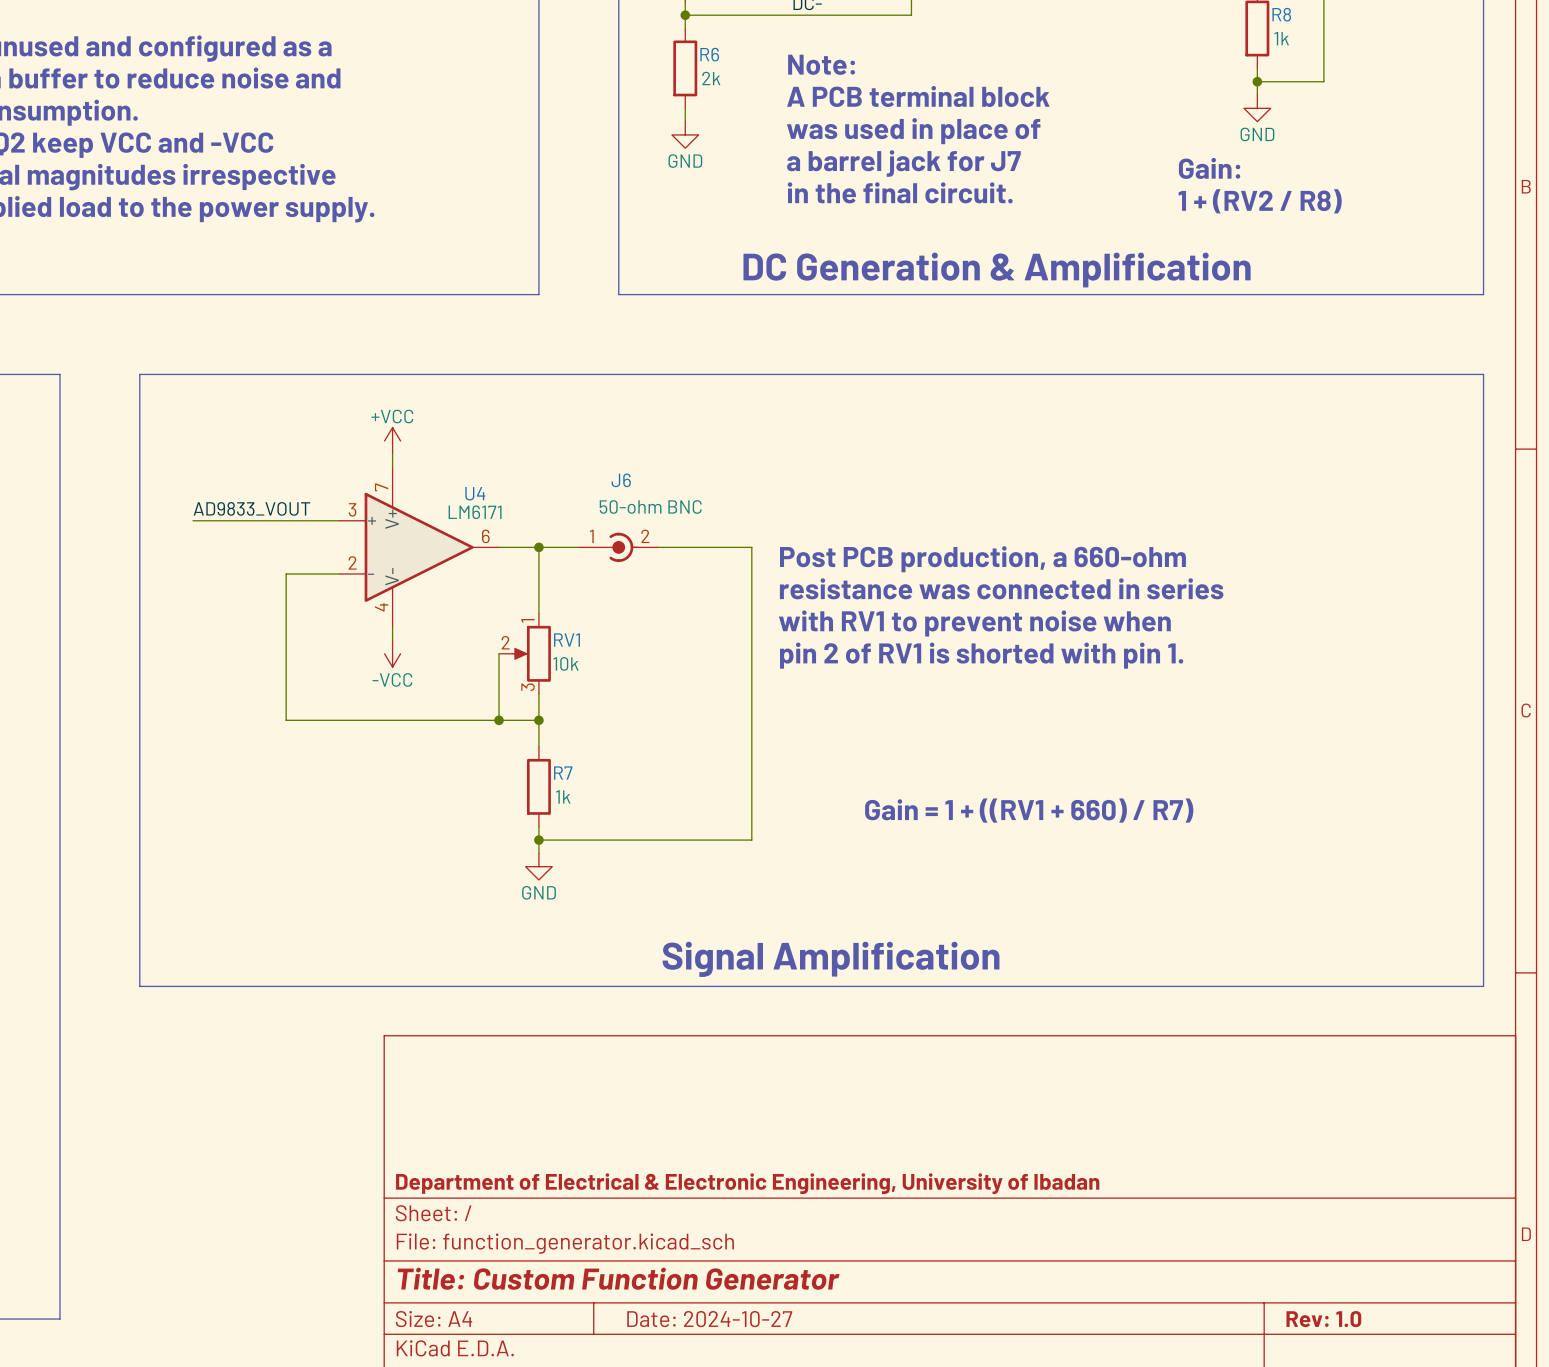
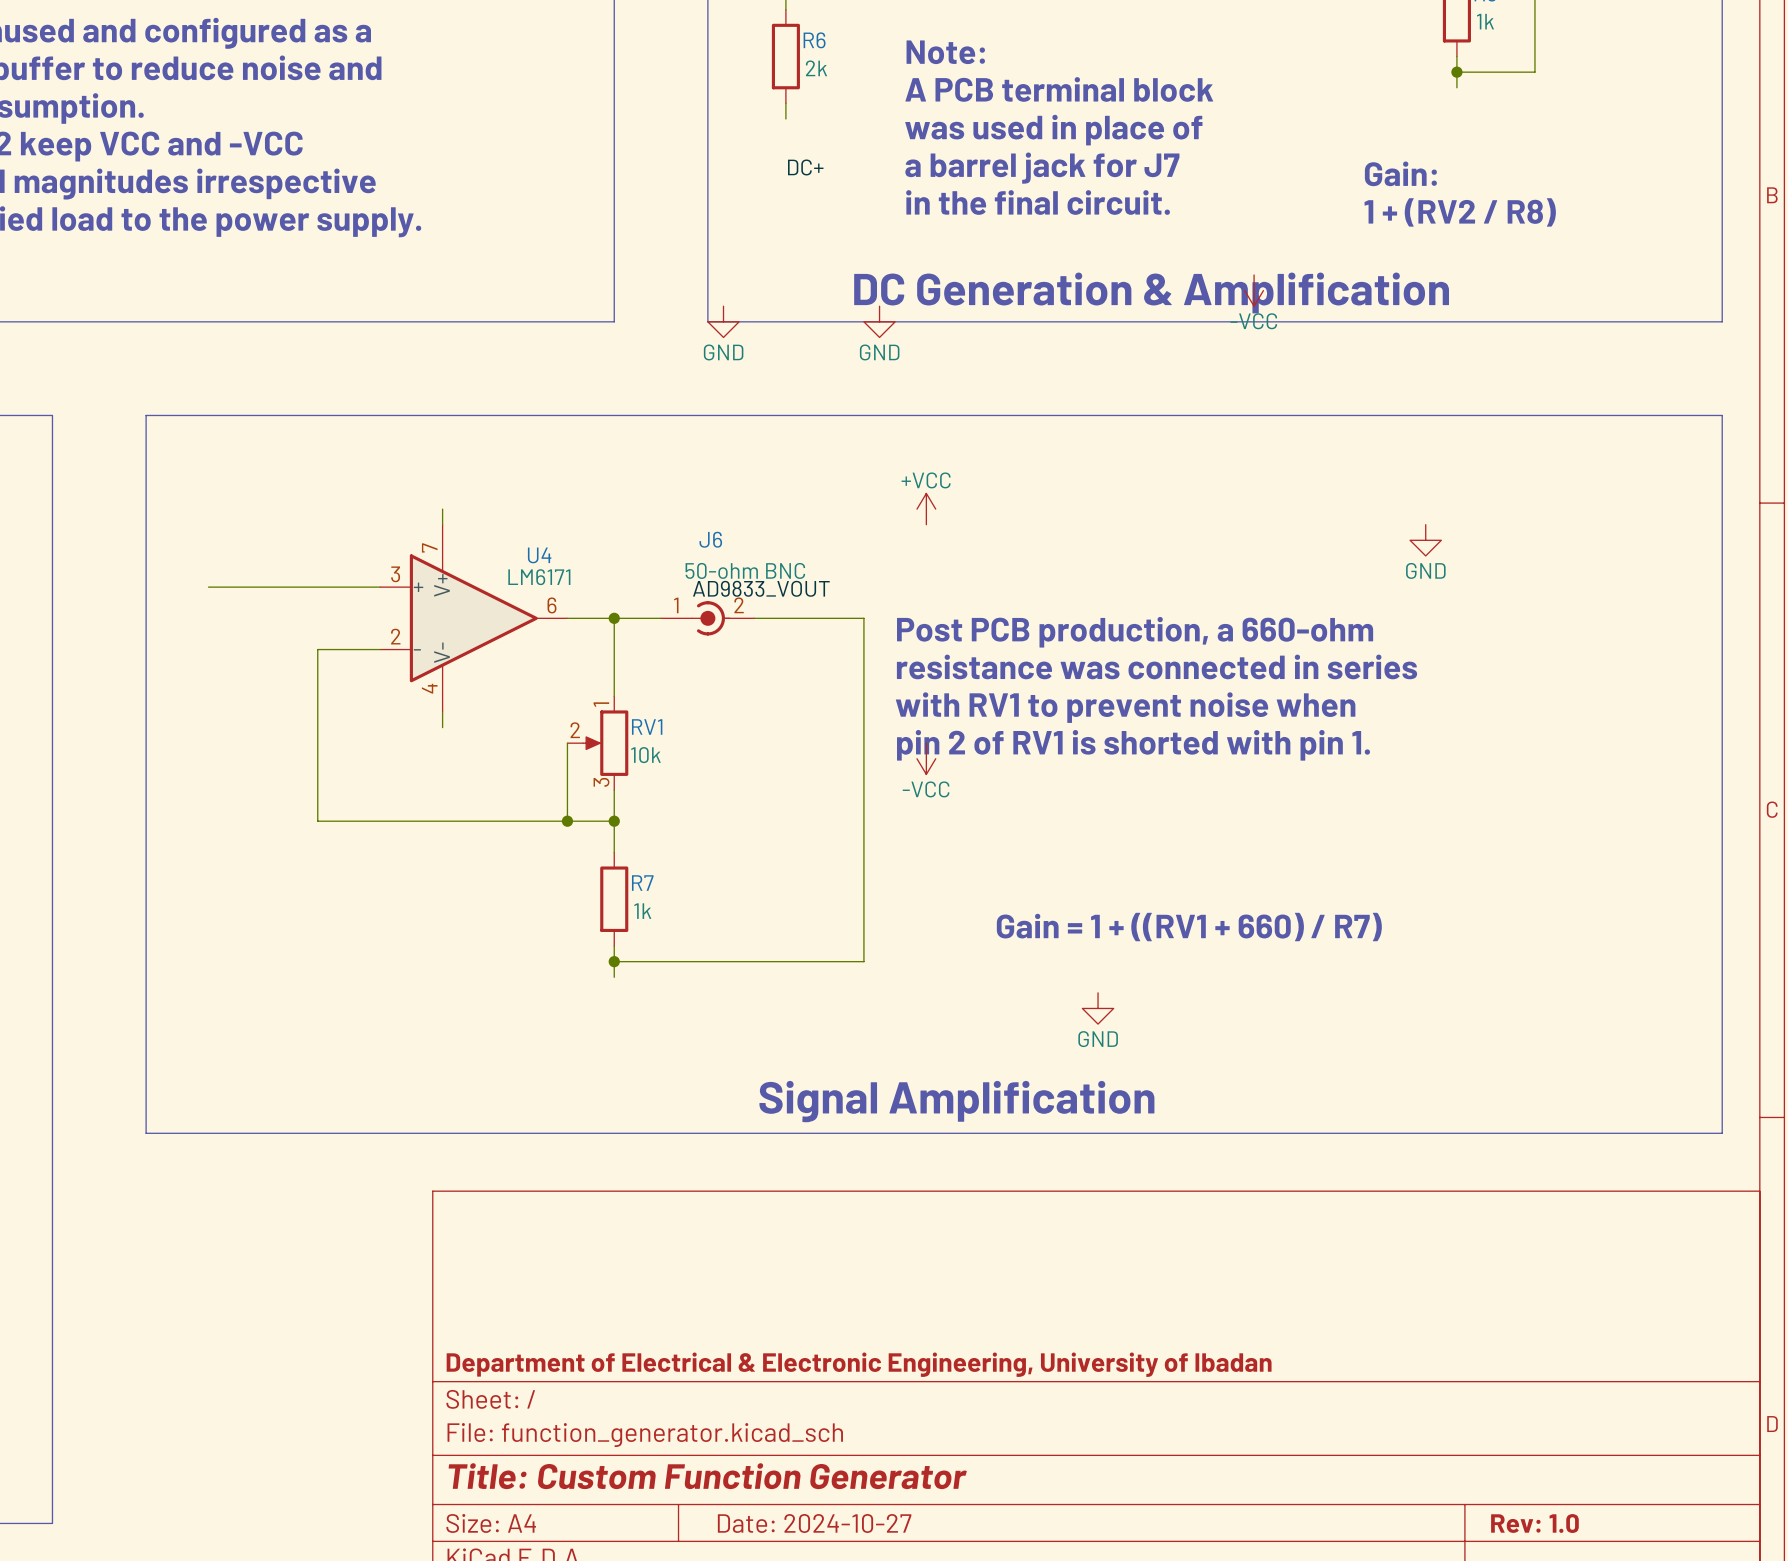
power symbol: GND (1257, 108) -> none
power symbol: GND (685, 134) -> none
label: none -> DC+ (805, 167)
power symbol: none -> -VCC (1254, 290)
power symbol: none -> GND (723, 321)
power symbol: none -> GND (879, 321)
power symbol: +VCC (392, 440) -> none
power symbol: none -> +VCC (926, 509)
power symbol: none -> GND (1425, 540)
label: AD9833_VOUT (251, 508) -> none
label: none -> AD9833_VOUT (761, 588)
power symbol: -VCC (392, 653) -> none
power symbol: none -> -VCC (926, 758)
power symbol: GND (538, 866) -> none
power symbol: none -> GND (1098, 1008)

